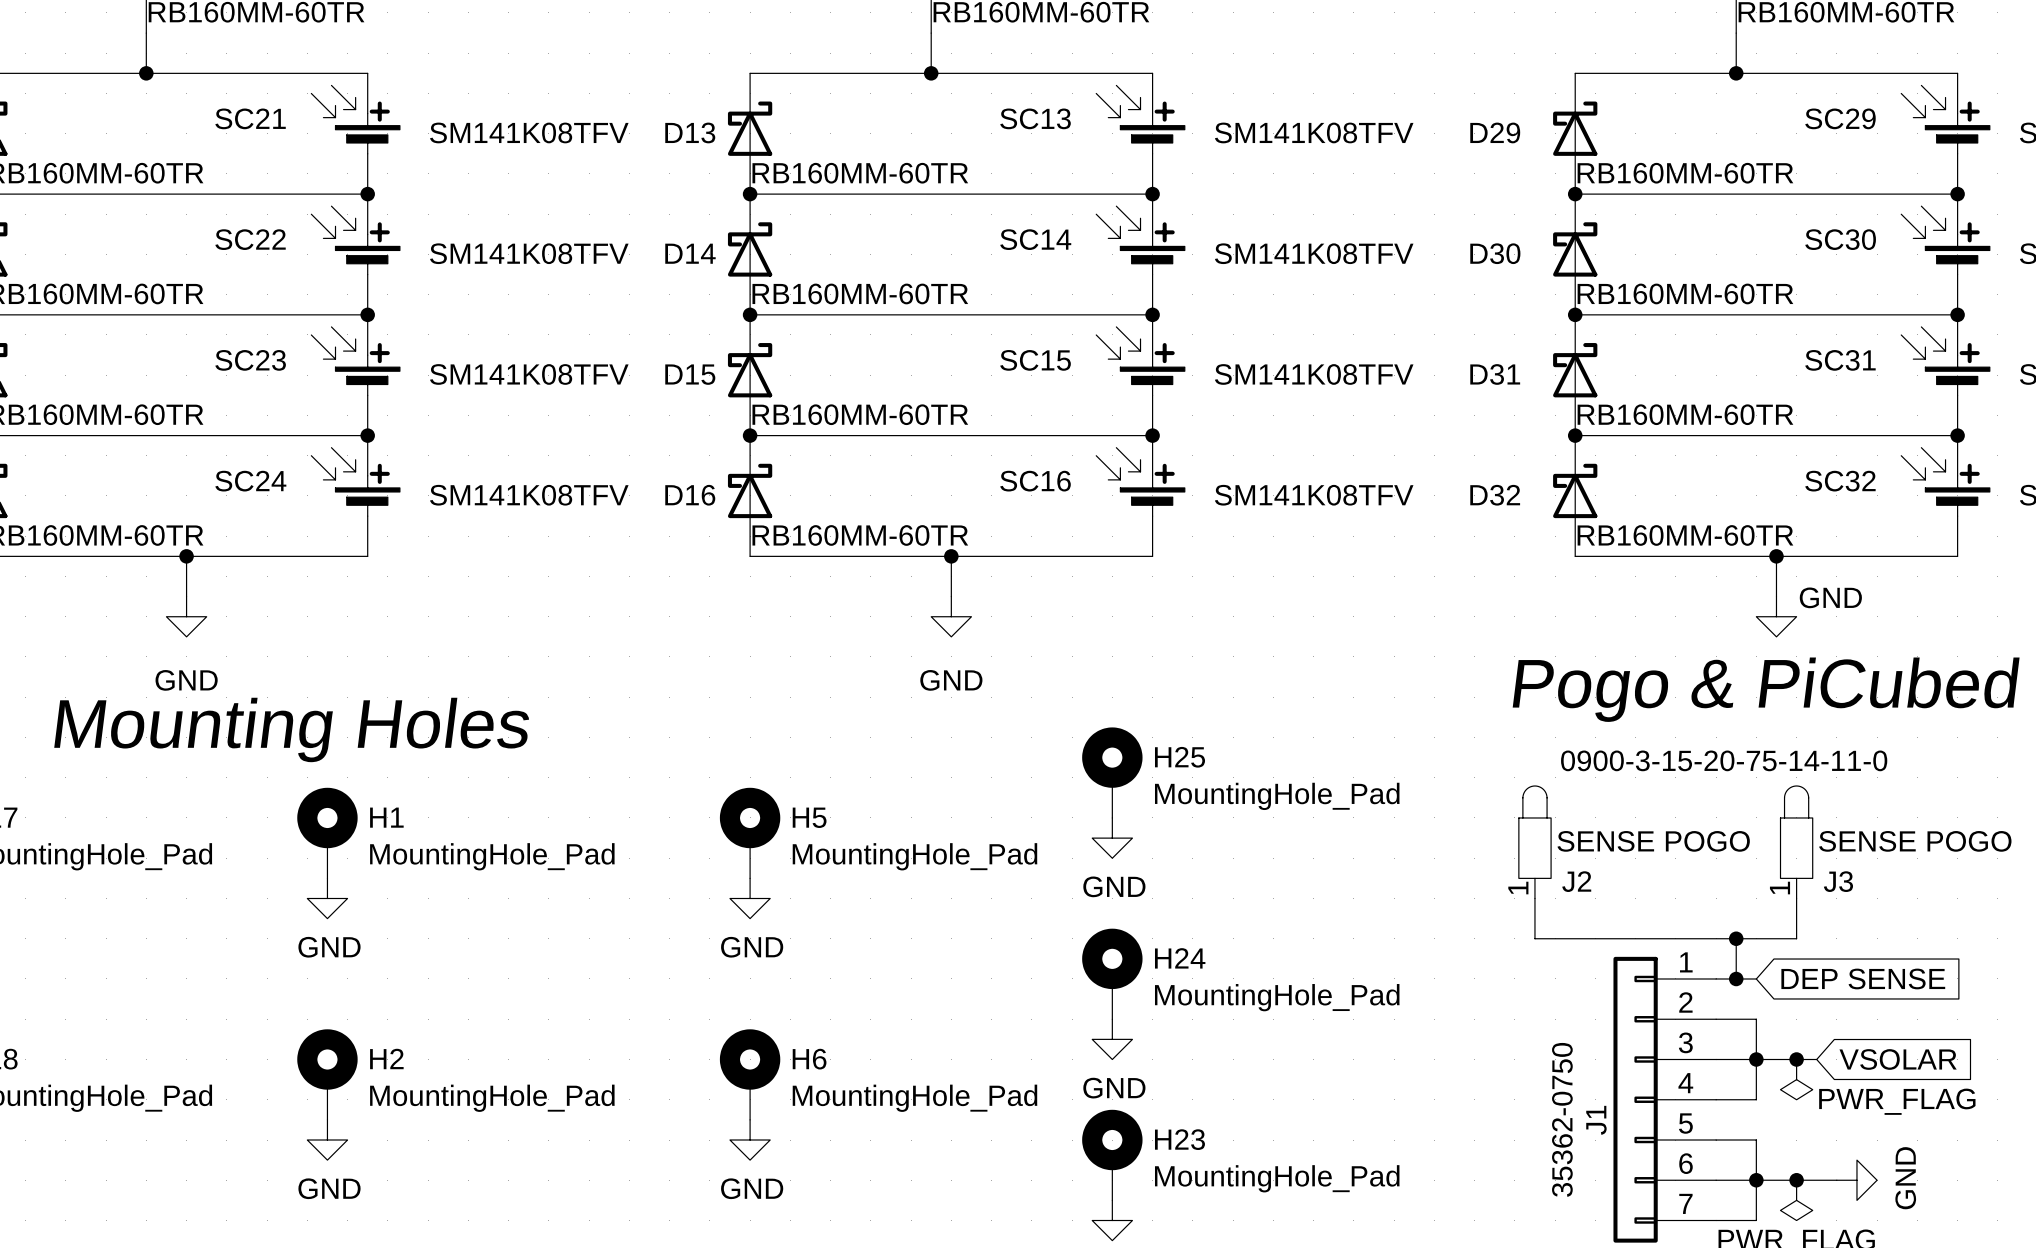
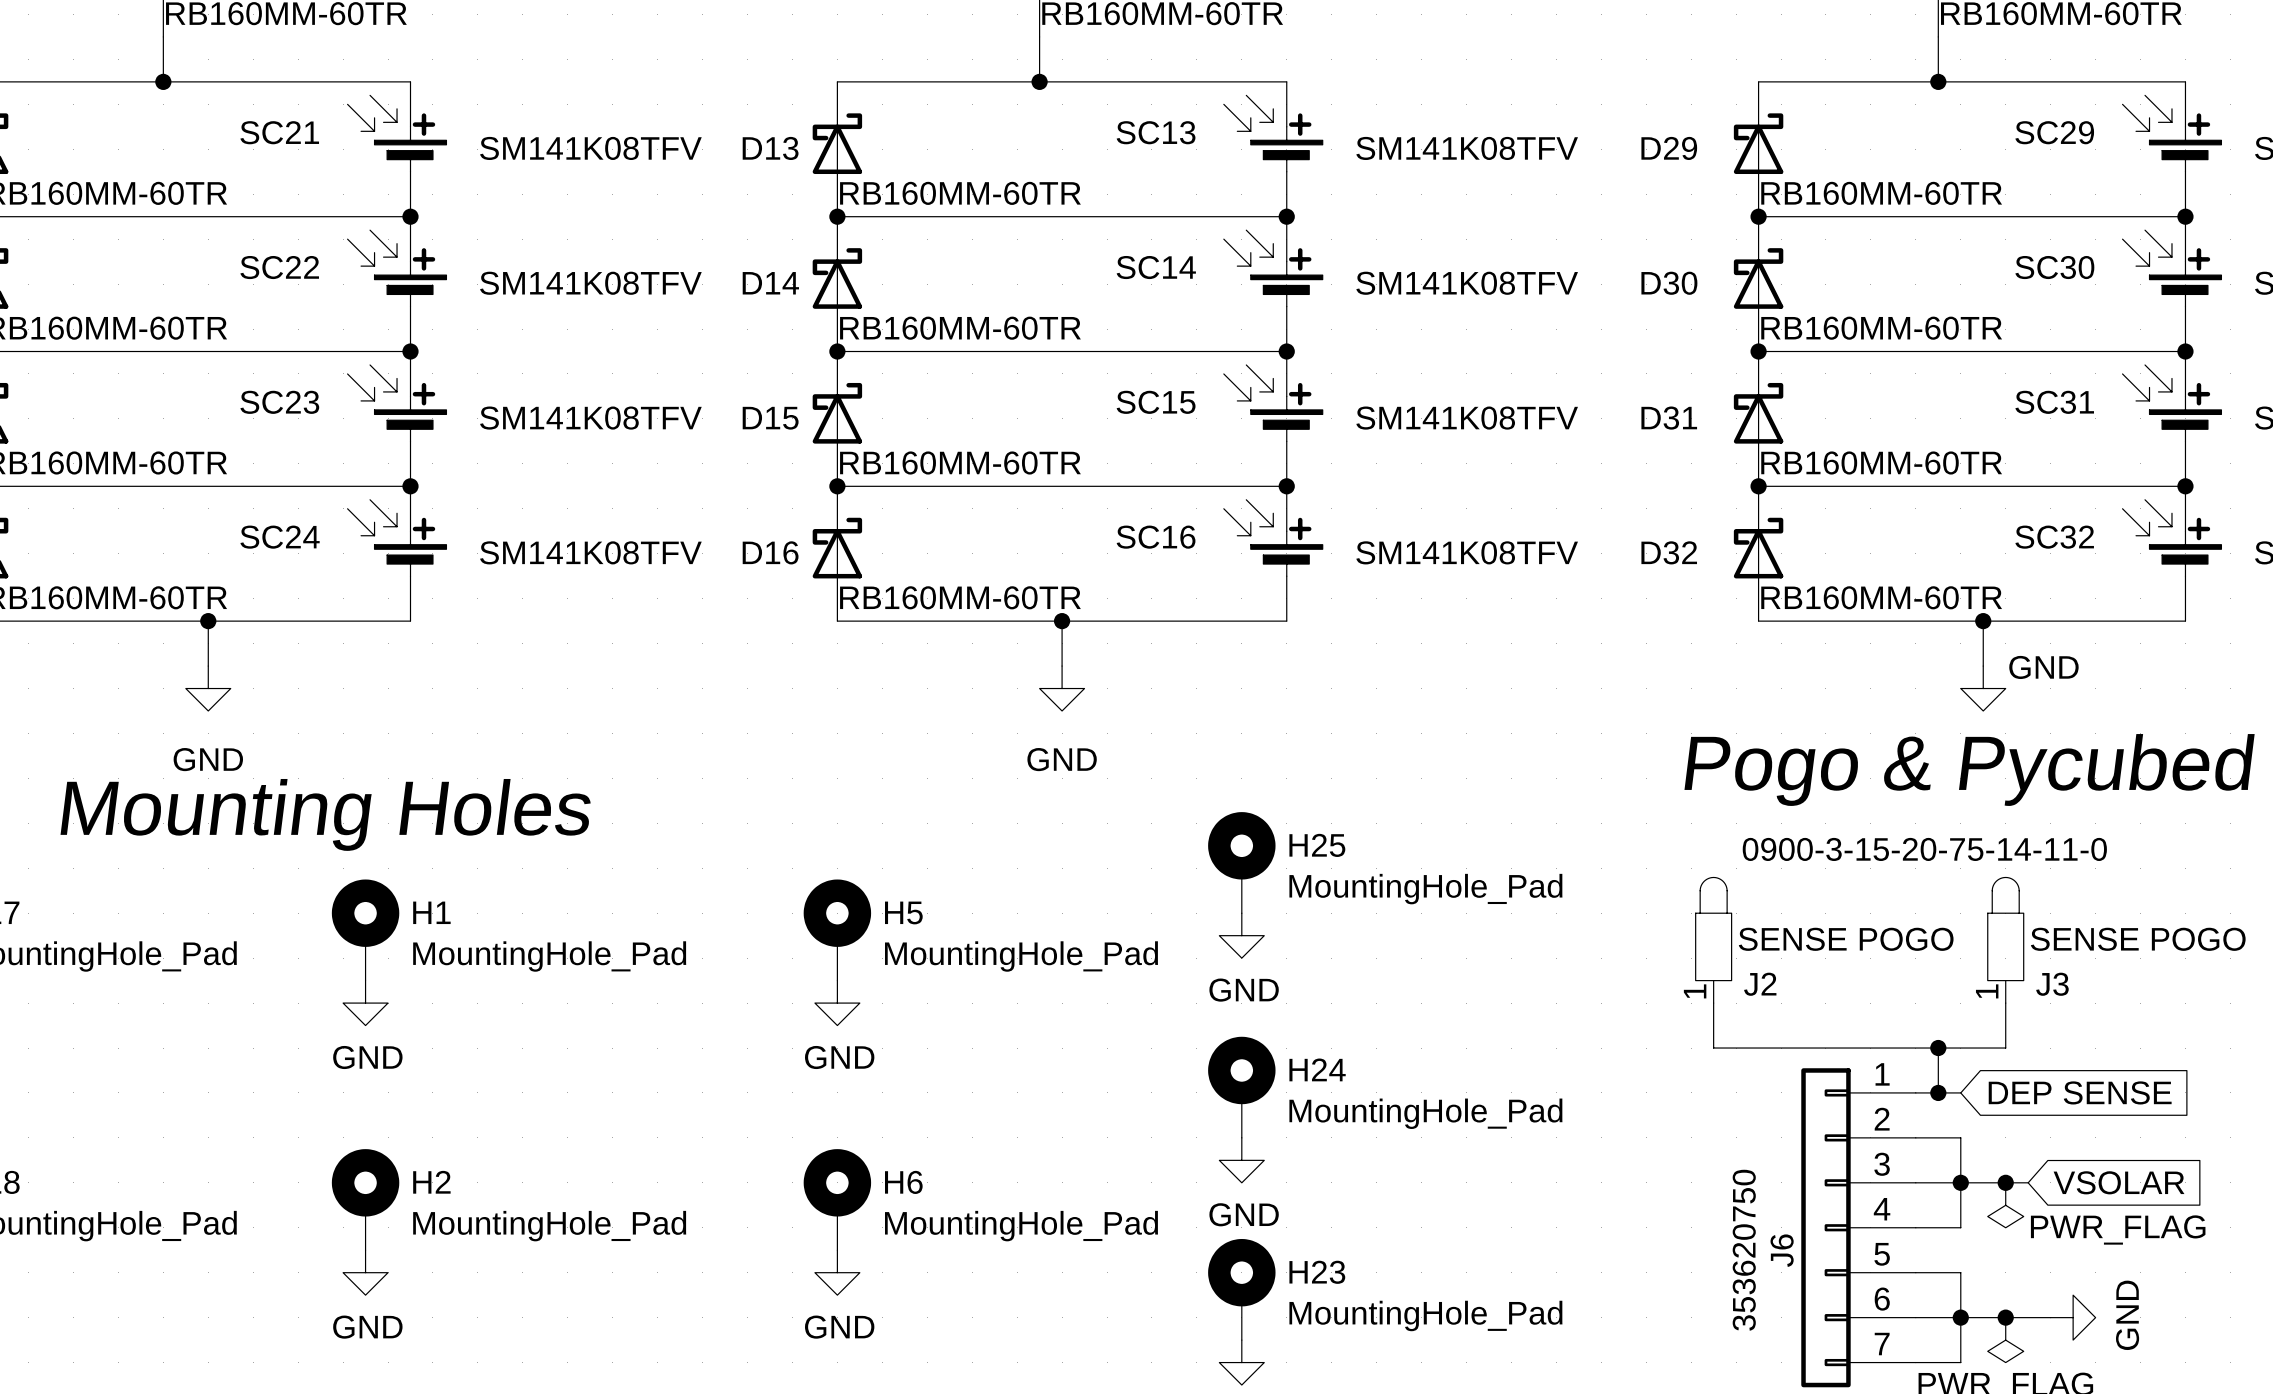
text: Pogo & PiCubed (1766, 689) -> Pogo & Pycubed (1969, 770)
J1 value: 35362-0750 (1562, 1119) -> 353620750 (1744, 1250)
J1 name: J1 (1596, 1120) -> J6 (1782, 1250)

